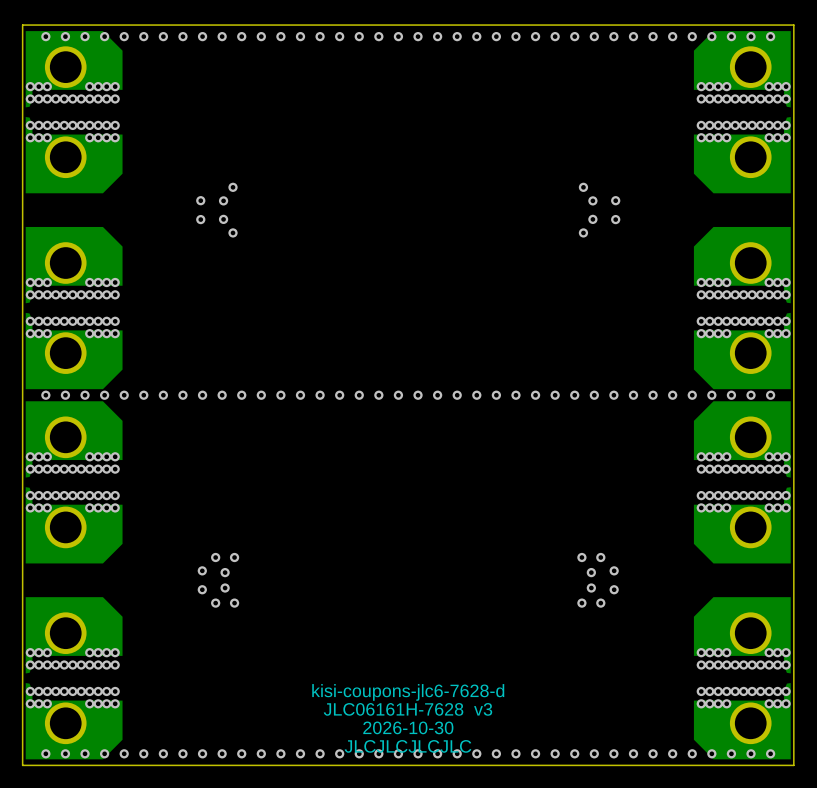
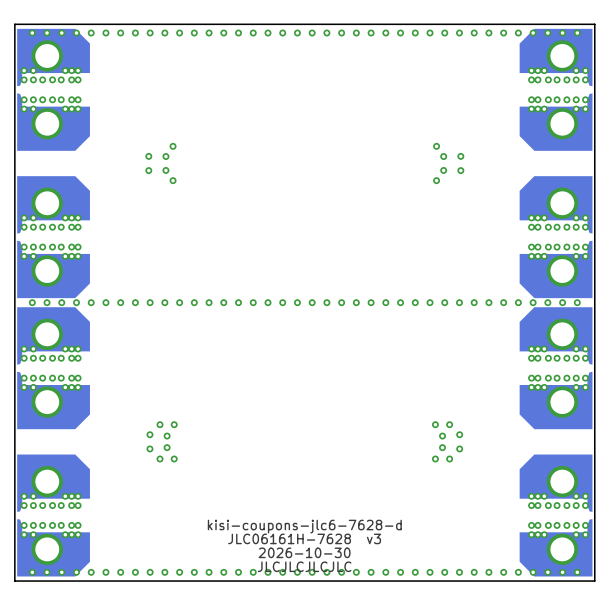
via: (30, 86) -> none
via: none -> (24, 70)
via: (38, 86) -> none
via: (115, 86) -> none
via: (701, 86) -> none
via: (777, 86) -> none
via: none -> (585, 70)
via: (786, 86) -> none
via: (30, 98) -> none
via: none -> (24, 79)
via: (38, 98) -> none
via: (55, 98) -> none
via: none -> (42, 79)
via: (64, 98) -> none
via: (81, 98) -> none
via: none -> (61, 79)
via: (89, 98) -> none
via: (115, 98) -> none
via: (701, 98) -> none
via: (726, 98) -> none
via: none -> (548, 79)
via: (735, 98) -> none
via: (752, 98) -> none
via: none -> (566, 79)
via: (760, 98) -> none
via: (777, 98) -> none
via: none -> (585, 79)
via: (786, 98) -> none
via: (30, 125) -> none
via: none -> (24, 99)
via: (38, 125) -> none
via: (55, 125) -> none
via: none -> (42, 99)
via: (64, 125) -> none
via: (81, 125) -> none
via: none -> (61, 99)
via: (89, 125) -> none
via: (115, 125) -> none
via: (701, 125) -> none
via: (726, 125) -> none
via: none -> (548, 99)
via: (735, 125) -> none
via: (752, 125) -> none
via: none -> (566, 99)
via: (760, 125) -> none
via: (777, 125) -> none
via: none -> (585, 99)
via: (786, 125) -> none
via: (30, 137) -> none
via: none -> (24, 109)
via: (38, 137) -> none
via: (115, 137) -> none
via: (701, 137) -> none
via: (777, 137) -> none
via: none -> (585, 109)
via: (786, 137) -> none
via: (30, 282) -> none
via: none -> (24, 217)
via: (38, 282) -> none
via: (115, 282) -> none
via: (701, 282) -> none
via: (777, 282) -> none
via: none -> (585, 217)
via: (786, 282) -> none
via: (30, 294) -> none
via: none -> (24, 227)
via: (38, 294) -> none
via: (55, 294) -> none
via: none -> (42, 227)
via: (64, 294) -> none
via: (81, 294) -> none
via: none -> (61, 227)
via: (89, 294) -> none
via: (115, 294) -> none
via: (701, 294) -> none
via: (726, 294) -> none
via: none -> (548, 227)
via: (735, 294) -> none
via: (752, 294) -> none
via: none -> (566, 227)
via: (760, 294) -> none
via: (777, 294) -> none
via: none -> (585, 227)
via: (786, 294) -> none
via: (30, 321) -> none
via: none -> (24, 247)
via: (38, 321) -> none
via: (55, 321) -> none
via: none -> (42, 247)
via: (64, 321) -> none
via: (81, 321) -> none
via: none -> (61, 247)
via: (89, 321) -> none
via: (115, 321) -> none
via: (701, 321) -> none
via: (726, 321) -> none
via: none -> (548, 247)
via: (735, 321) -> none
via: (752, 321) -> none
via: none -> (566, 247)
via: (760, 321) -> none
via: (777, 321) -> none
via: none -> (585, 247)
via: (786, 321) -> none
via: (30, 333) -> none
via: none -> (24, 256)
via: (38, 333) -> none
via: (115, 333) -> none
via: (701, 333) -> none
via: (777, 333) -> none
via: none -> (585, 256)
via: (786, 333) -> none
via: (30, 456) -> none
via: none -> (24, 348)
via: (38, 456) -> none
via: (115, 456) -> none
via: (701, 456) -> none
via: (777, 456) -> none
via: none -> (585, 348)
via: (786, 456) -> none
via: (30, 469) -> none
via: none -> (24, 358)
via: (38, 469) -> none
via: (55, 469) -> none
via: none -> (42, 358)
via: (64, 469) -> none
via: (81, 469) -> none
via: none -> (61, 358)
via: (89, 469) -> none
via: (115, 469) -> none
via: (701, 469) -> none
via: (726, 469) -> none
via: none -> (548, 358)
via: (735, 469) -> none
via: (752, 469) -> none
via: none -> (566, 358)
via: (760, 469) -> none
via: (777, 469) -> none
via: none -> (585, 358)
via: (786, 469) -> none
via: (30, 495) -> none
via: none -> (24, 378)
via: (38, 495) -> none
via: (55, 495) -> none
via: none -> (42, 378)
via: (64, 495) -> none
via: (81, 495) -> none
via: none -> (61, 378)
via: (89, 495) -> none
via: (115, 495) -> none
via: (701, 495) -> none
via: (726, 495) -> none
via: none -> (548, 378)
via: (735, 495) -> none
via: (752, 495) -> none
via: none -> (566, 378)
via: (760, 495) -> none
via: (777, 495) -> none
via: none -> (585, 378)
via: (786, 495) -> none
via: (30, 507) -> none
via: none -> (24, 387)
via: (38, 507) -> none
via: (115, 507) -> none
via: (701, 507) -> none
via: (777, 507) -> none
via: none -> (585, 387)
via: (786, 507) -> none
via: (30, 652) -> none
via: none -> (24, 496)
via: (38, 652) -> none
via: (115, 652) -> none
via: (701, 652) -> none
via: (777, 652) -> none
via: none -> (585, 496)
via: (786, 652) -> none
via: (30, 665) -> none
via: none -> (24, 505)
via: (38, 665) -> none
via: (55, 665) -> none
via: none -> (42, 505)
via: (64, 665) -> none
via: (81, 665) -> none
via: none -> (61, 505)
via: (89, 665) -> none
via: (115, 665) -> none
via: (701, 665) -> none
via: (726, 665) -> none
via: none -> (548, 505)
via: (735, 665) -> none
via: (752, 665) -> none
via: none -> (566, 505)
via: (760, 665) -> none
via: (777, 665) -> none
via: none -> (585, 505)
via: (786, 665) -> none
via: (30, 691) -> none
via: none -> (24, 525)
via: (38, 691) -> none
via: (55, 691) -> none
via: none -> (42, 525)
via: (64, 691) -> none
via: (81, 691) -> none
via: none -> (61, 525)
via: (89, 691) -> none
via: (115, 691) -> none
via: (701, 691) -> none
via: (726, 691) -> none
via: none -> (548, 525)
via: (735, 691) -> none
via: (752, 691) -> none
via: none -> (566, 525)
via: (760, 691) -> none
via: (777, 691) -> none
via: none -> (585, 525)
via: (786, 691) -> none
via: (30, 703) -> none
via: none -> (24, 534)
via: (38, 703) -> none
via: (115, 703) -> none
via: (701, 703) -> none
via: (777, 703) -> none
via: none -> (585, 534)
via: (786, 703) -> none

